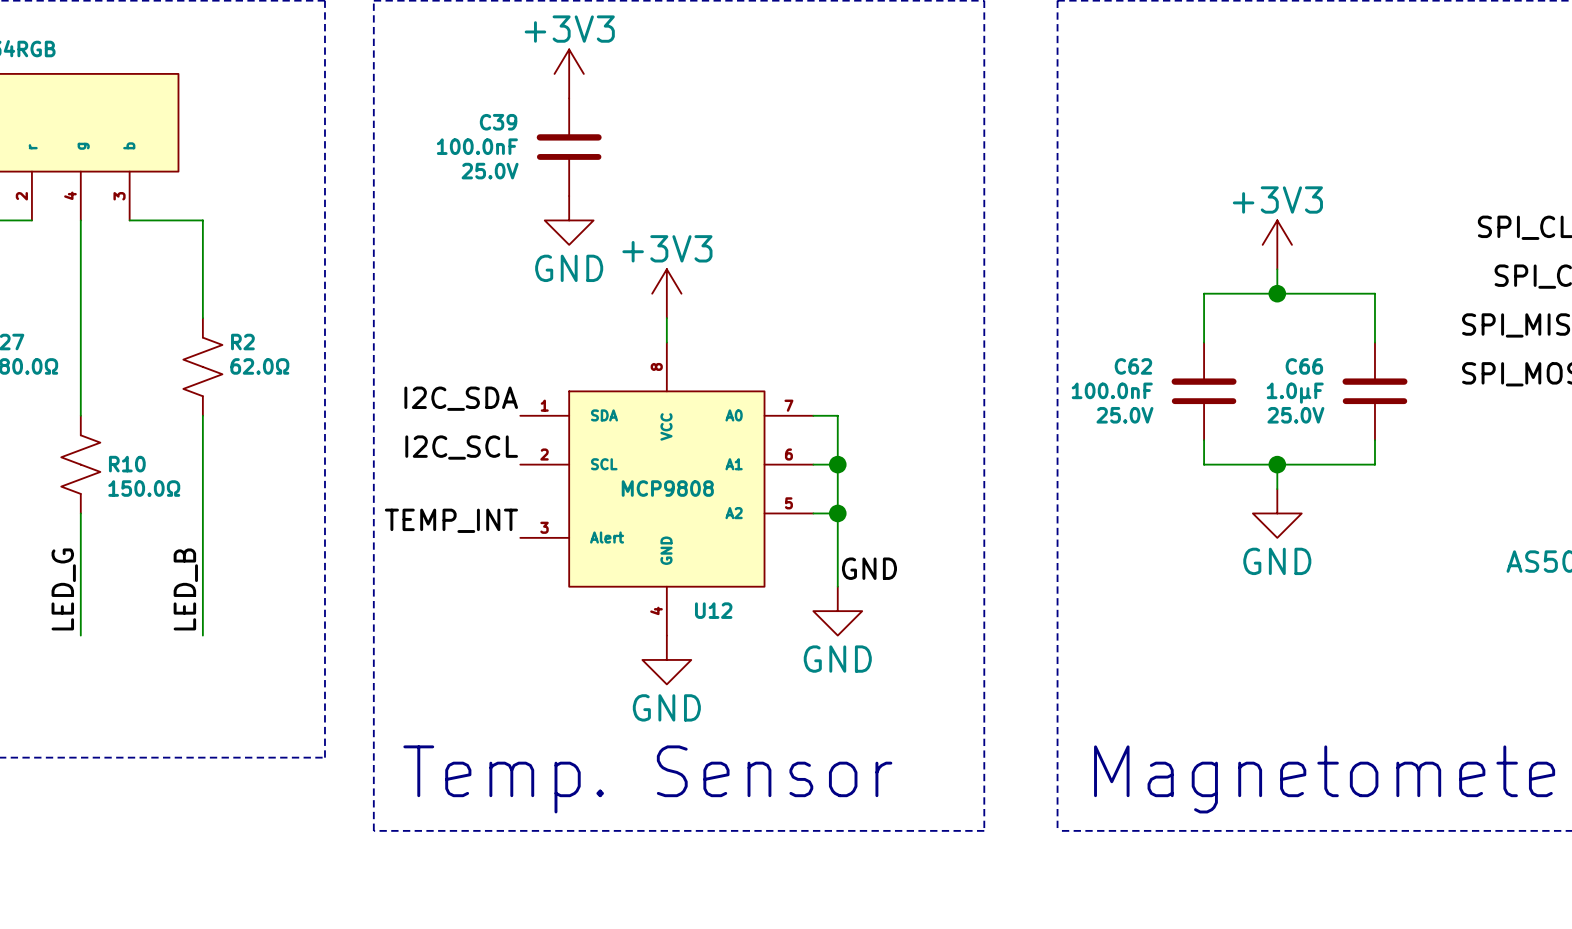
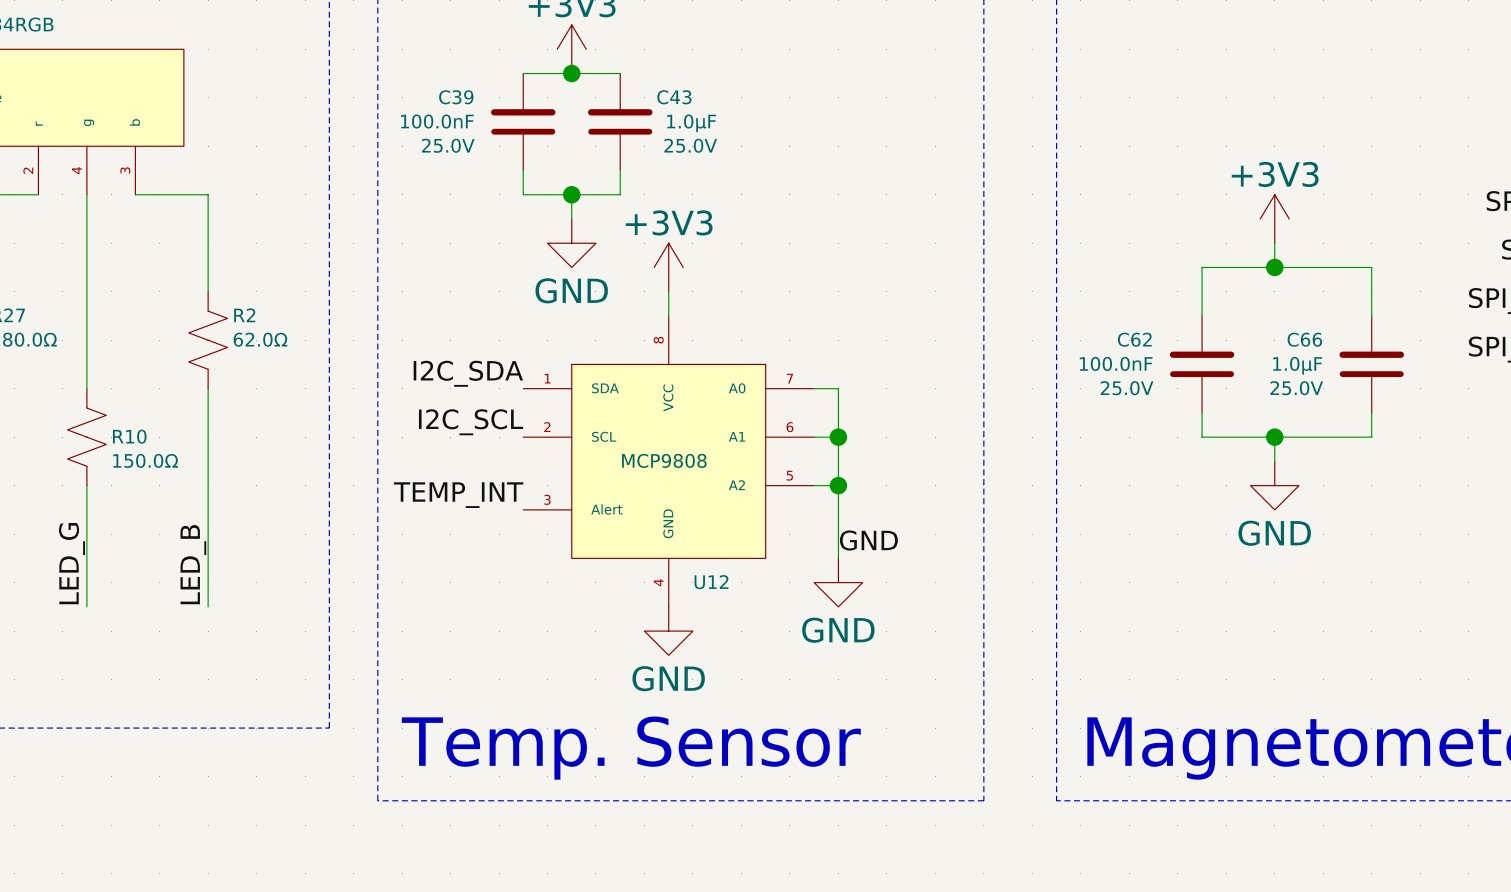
wire: none -> (523, 73) (620, 73)
junction: none -> (571, 73)
C39 position: (569, 147) -> (523, 122)
C43: none -> 1.0μF (620, 122)
wire: none -> (523, 170) (523, 194) (620, 194) (620, 170)
wire: none -> (571, 194) (571, 218)
power symbol position: GND (569, 220) -> GND (571, 243)
junction: none -> (571, 194)

